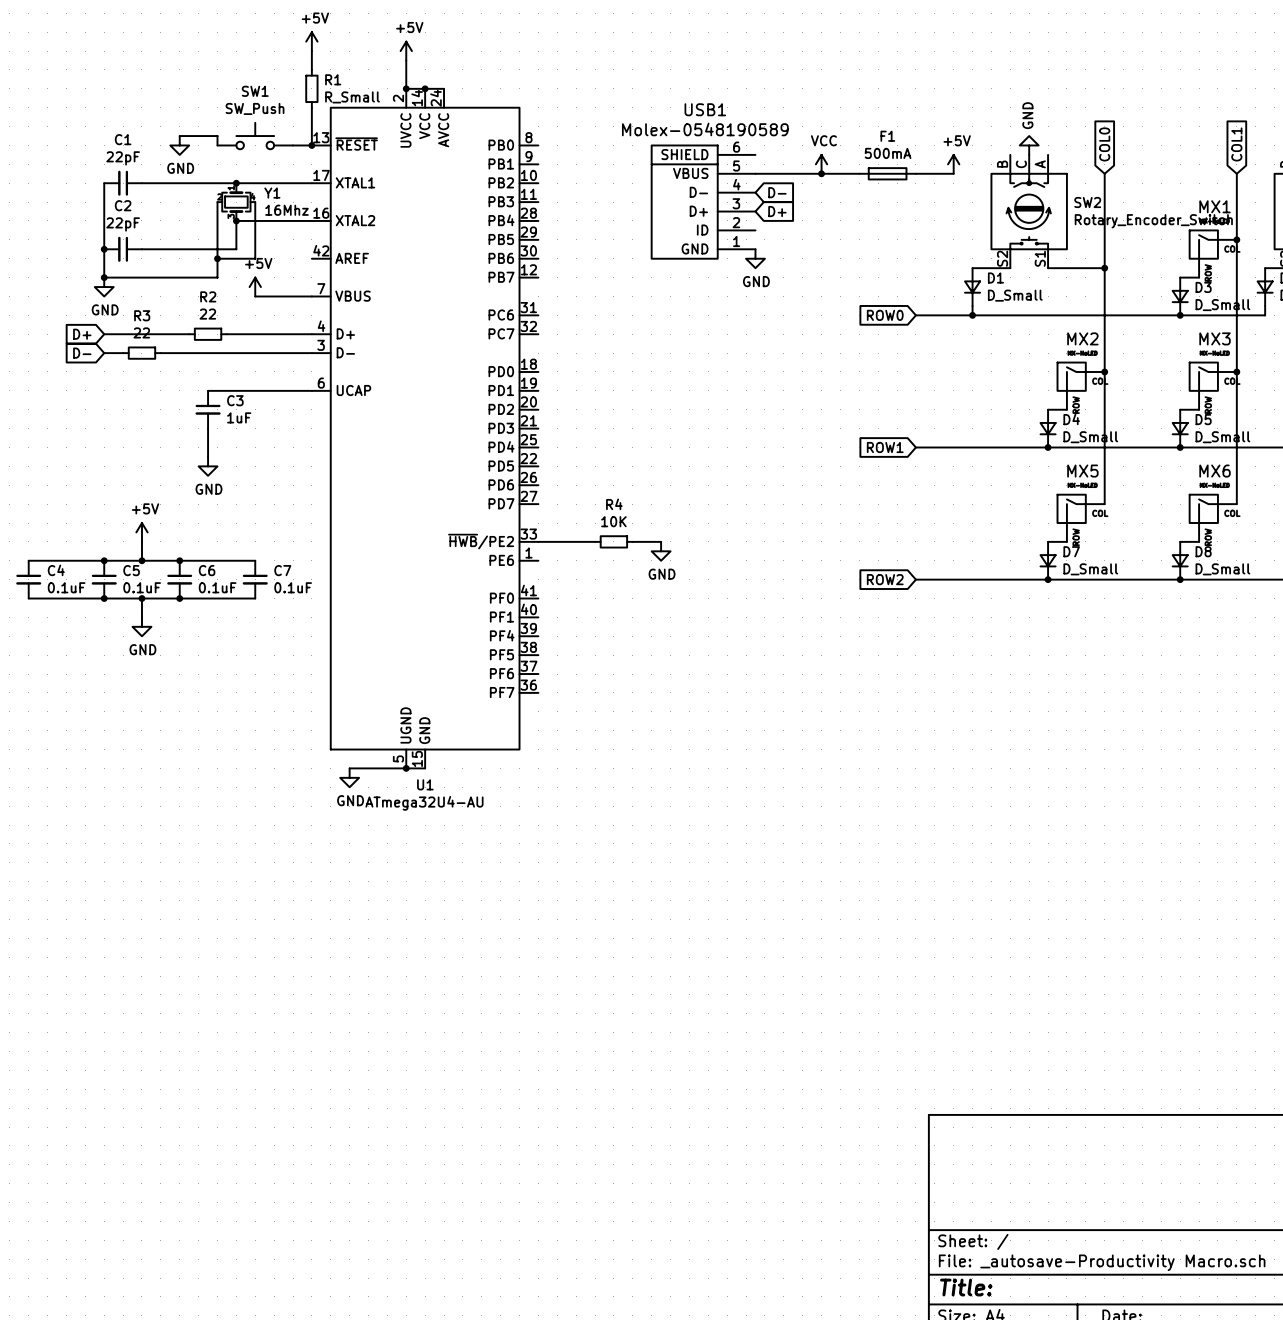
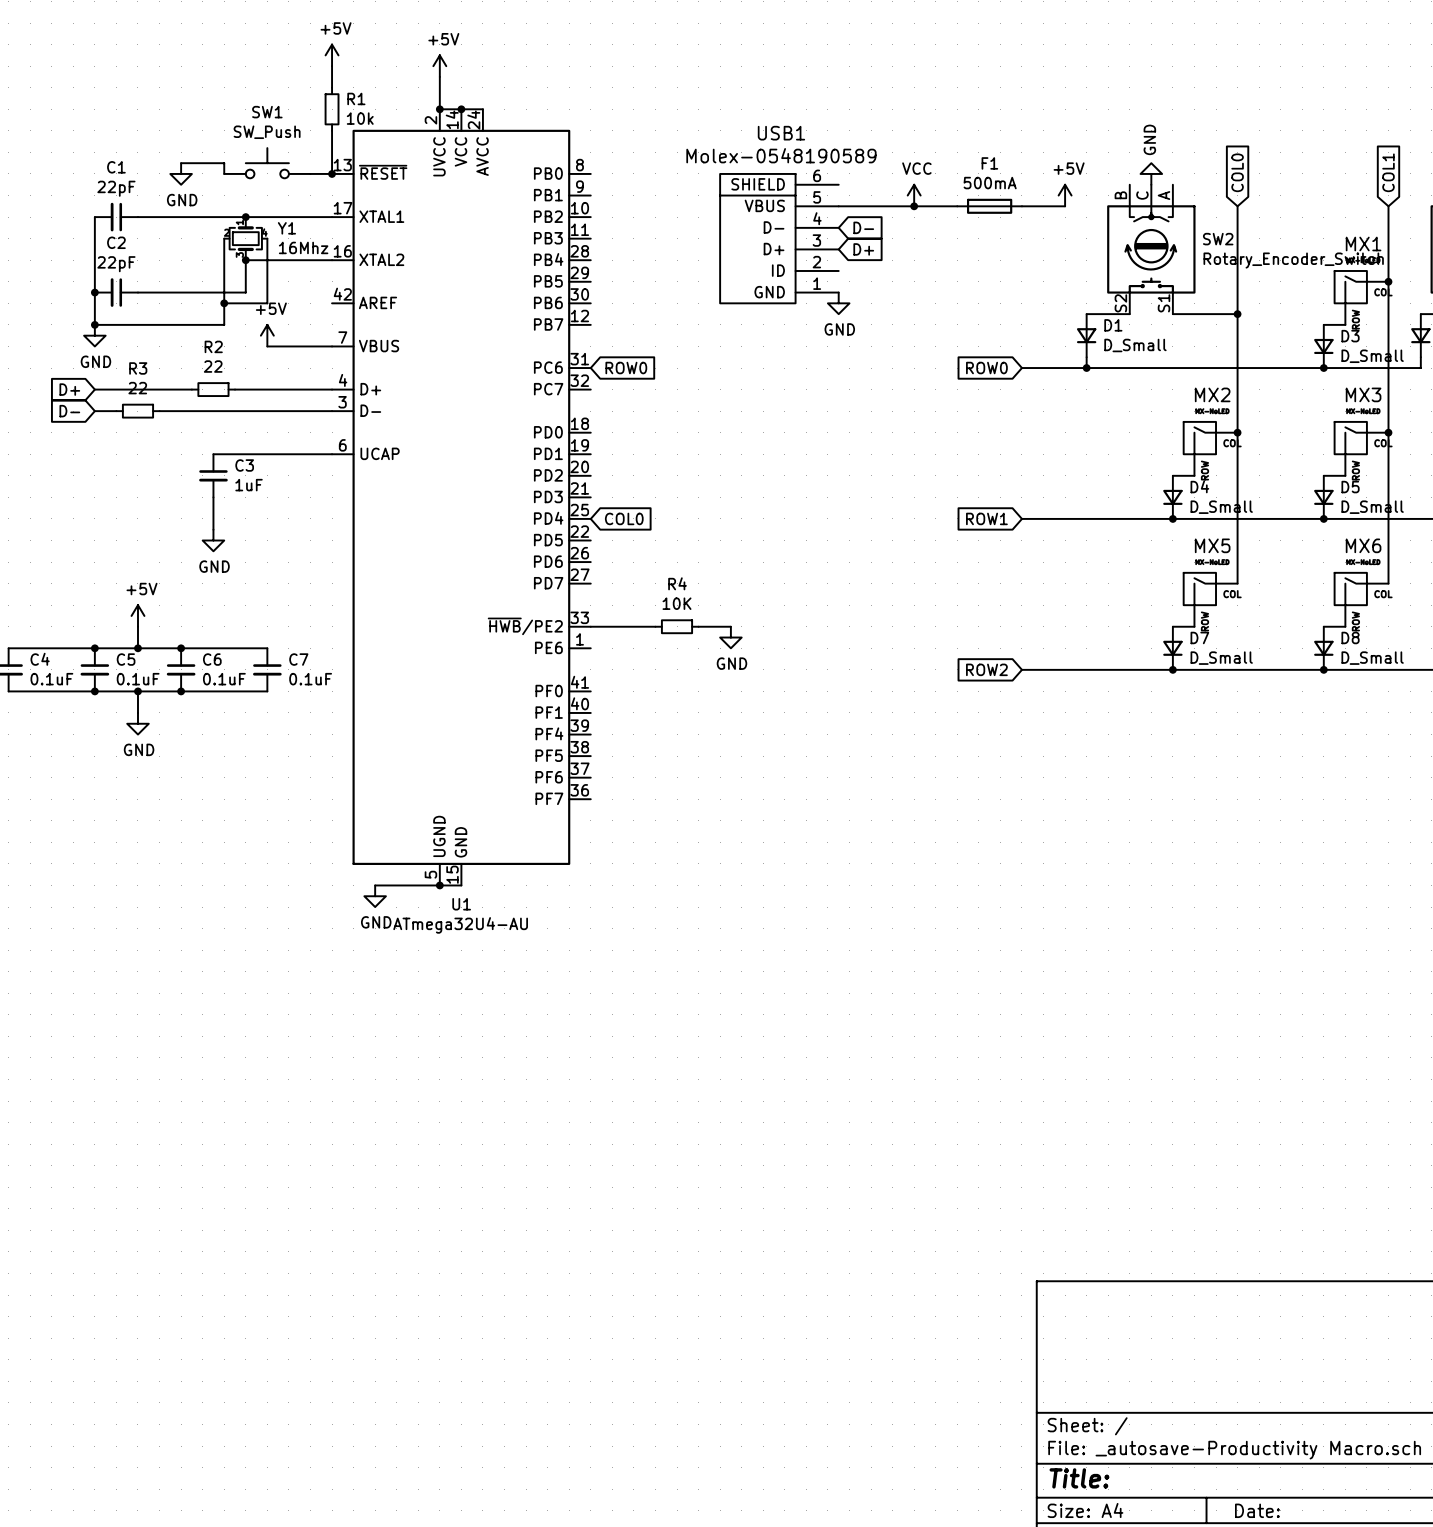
R1 value: R_Small (352, 97) -> 10k (360, 118)
global label: none -> ROW0 (626, 368)
global label: none -> COL0 (624, 518)

